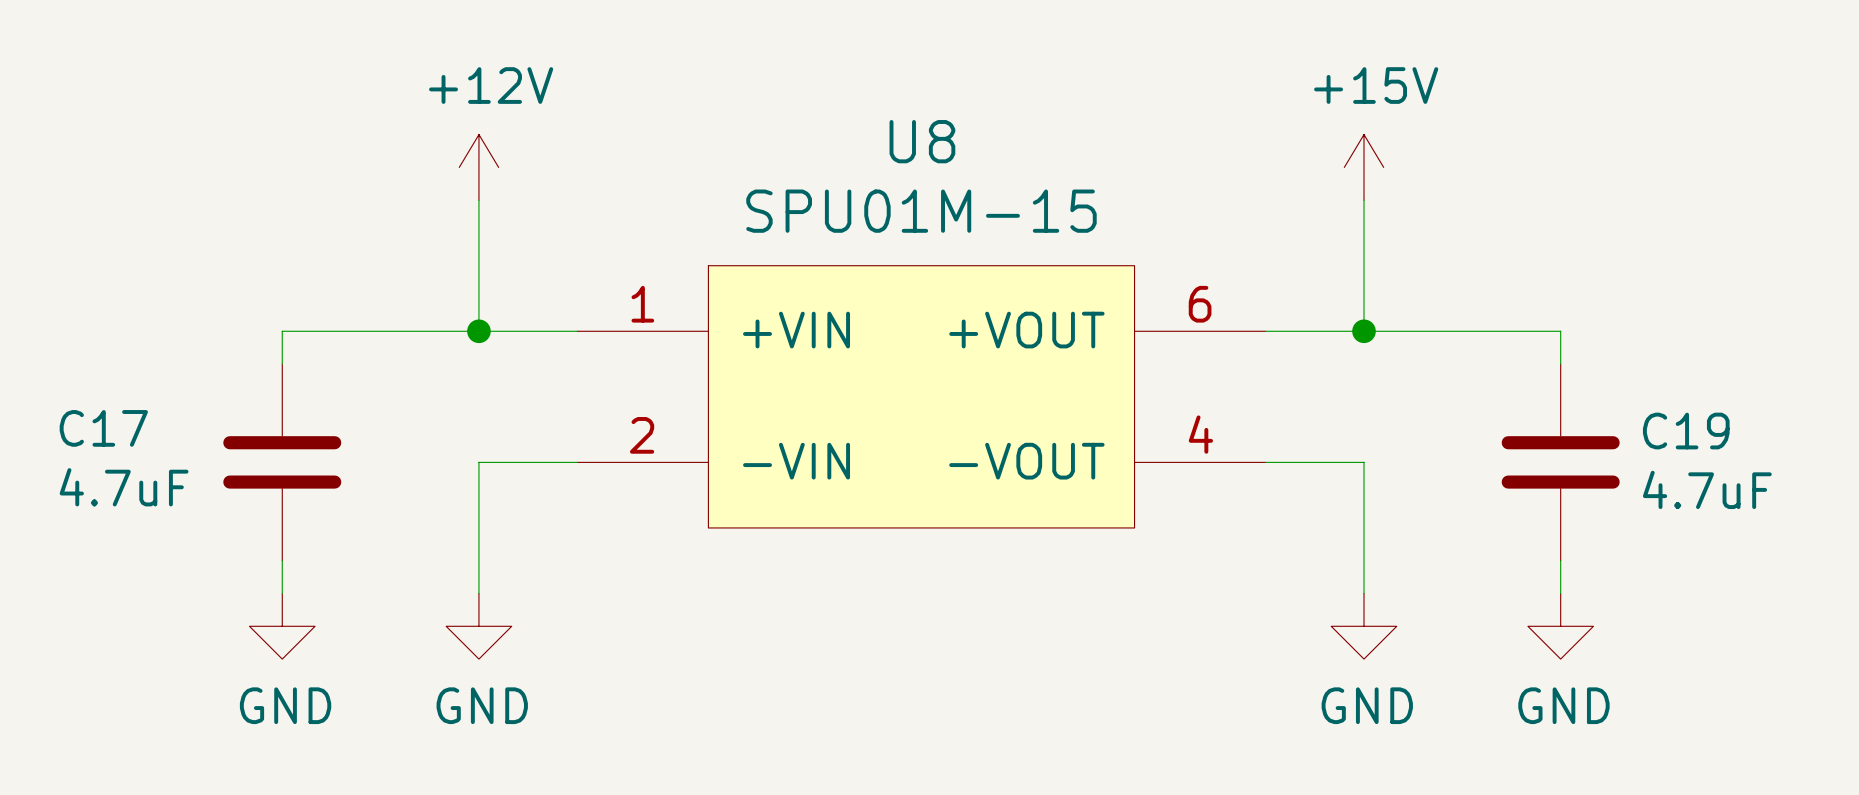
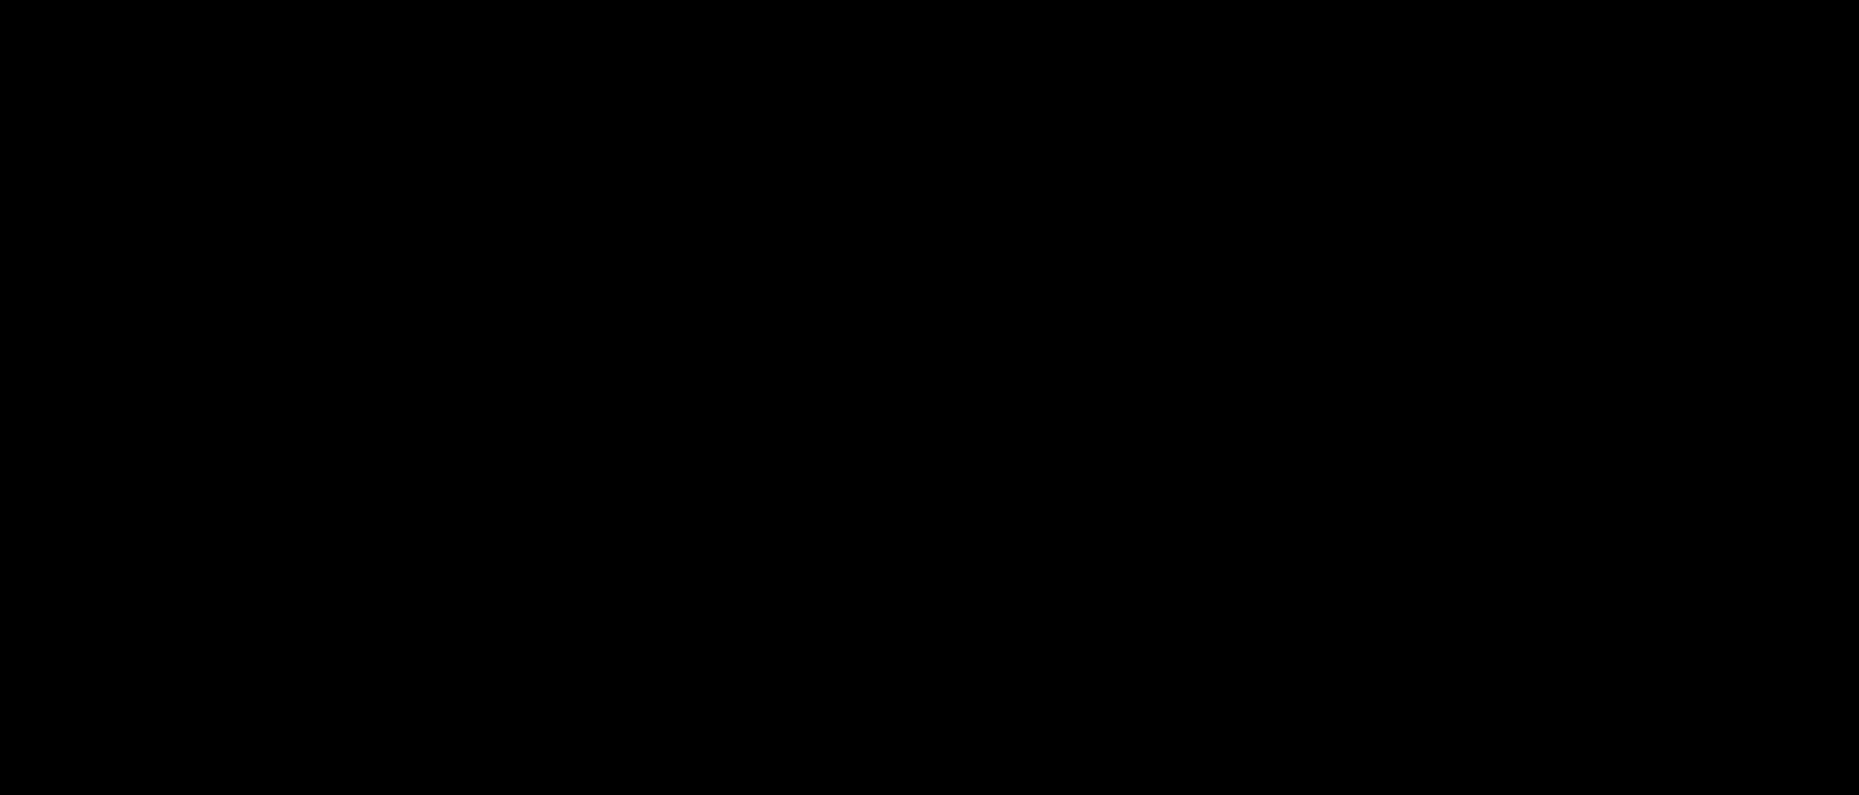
power symbol: +12V (478, 167) -> none
power symbol: +15V (1364, 167) -> none
wire: (478, 200) (478, 331) -> none
wire: (1364, 200) (1364, 331) -> none
junction: (478, 331) -> none
wire: (577, 331) (282, 331) (282, 364) -> none
wire: (1265, 331) (1560, 331) (1560, 364) -> none
junction: (1364, 331) -> none
U8: SPU01M-15 (921, 396) -> none
C17: 4.7uF (282, 462) -> none
wire: (577, 462) (478, 462) (478, 593) -> none
wire: (1265, 462) (1364, 462) (1364, 593) -> none
C19: 4.7uF (1560, 462) -> none
wire: (282, 560) (282, 593) -> none
wire: (1560, 560) (1560, 593) -> none
power symbol: GND (282, 626) -> none
power symbol: GND (478, 626) -> none
power symbol: GND (1364, 626) -> none
power symbol: GND (1560, 626) -> none

